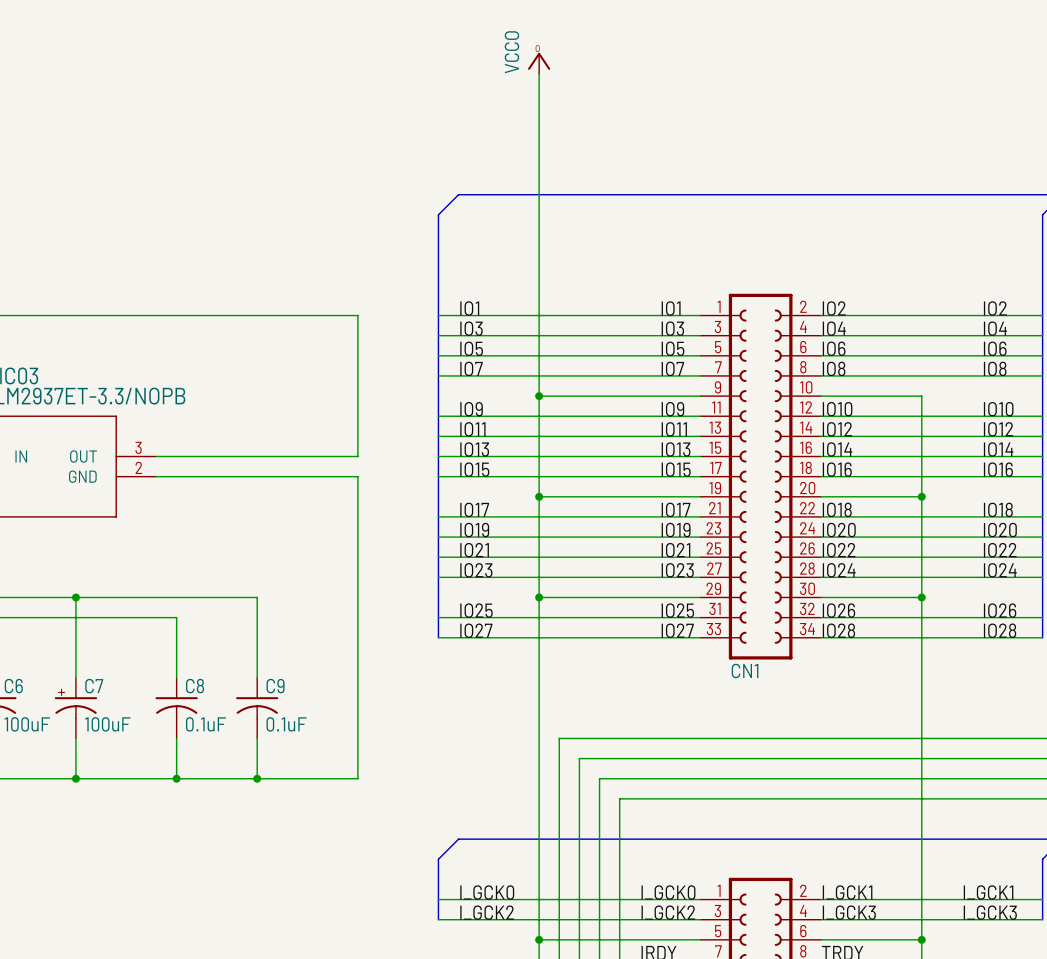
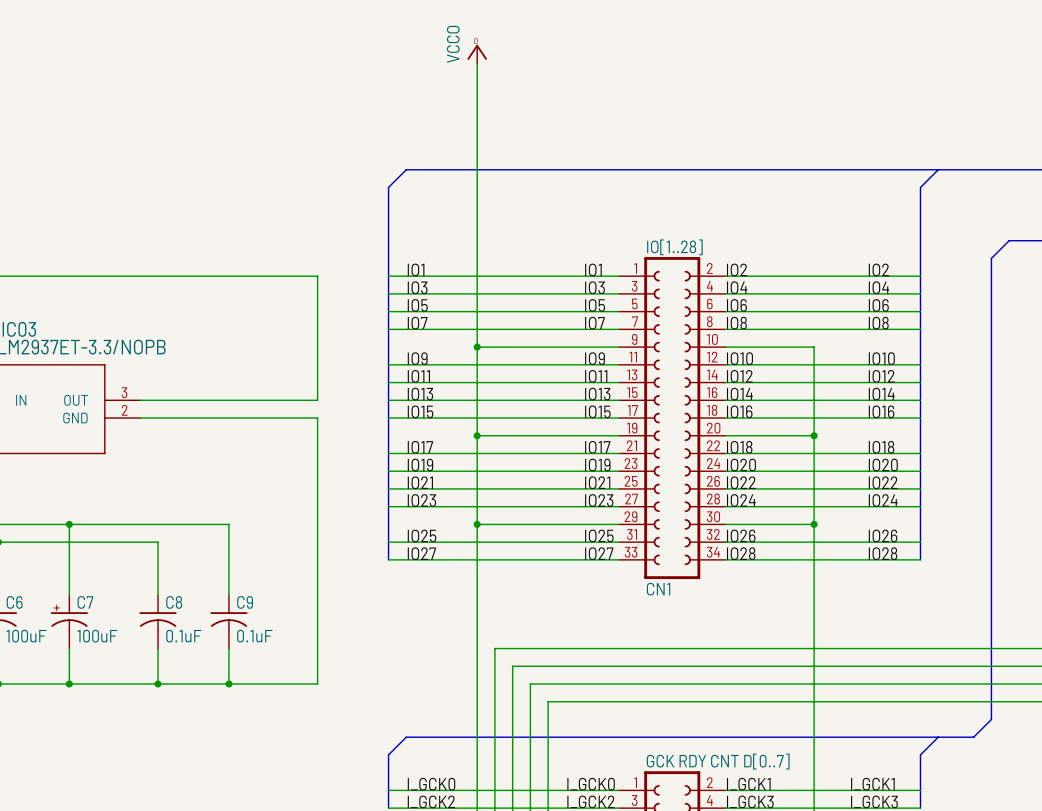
CN1 value: none -> IO[1..28] (674, 247)
part value: none -> GCK RDY CNT D[0..7] (718, 761)

